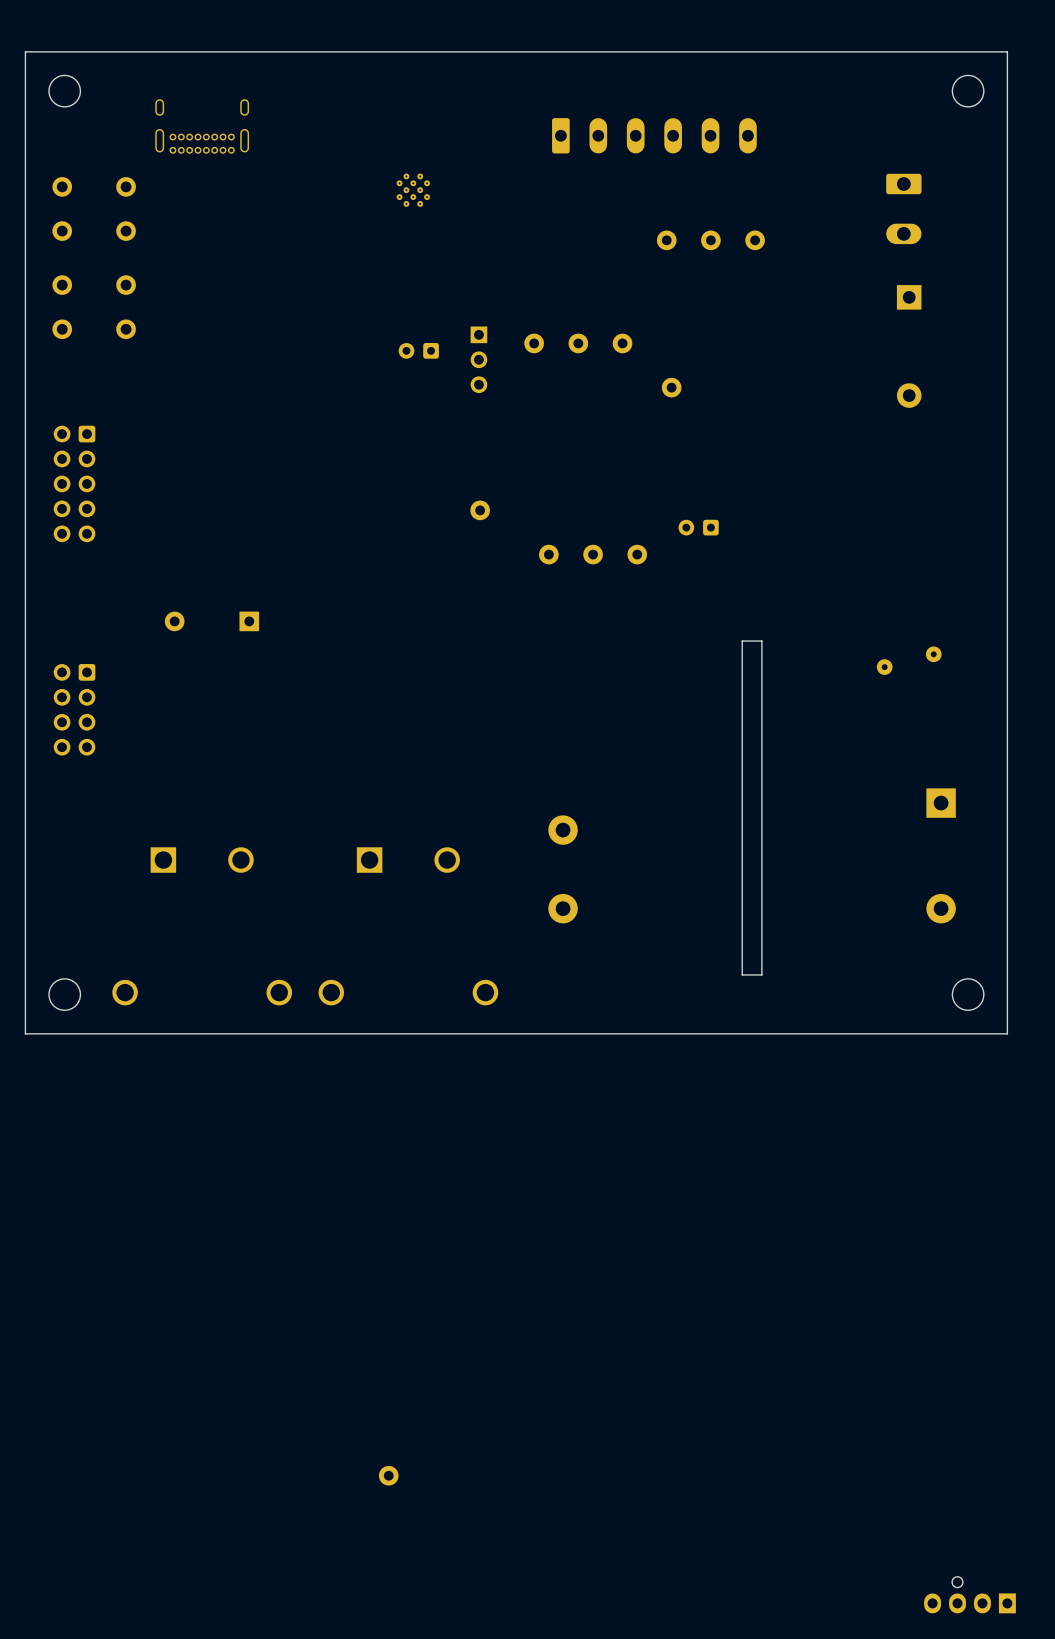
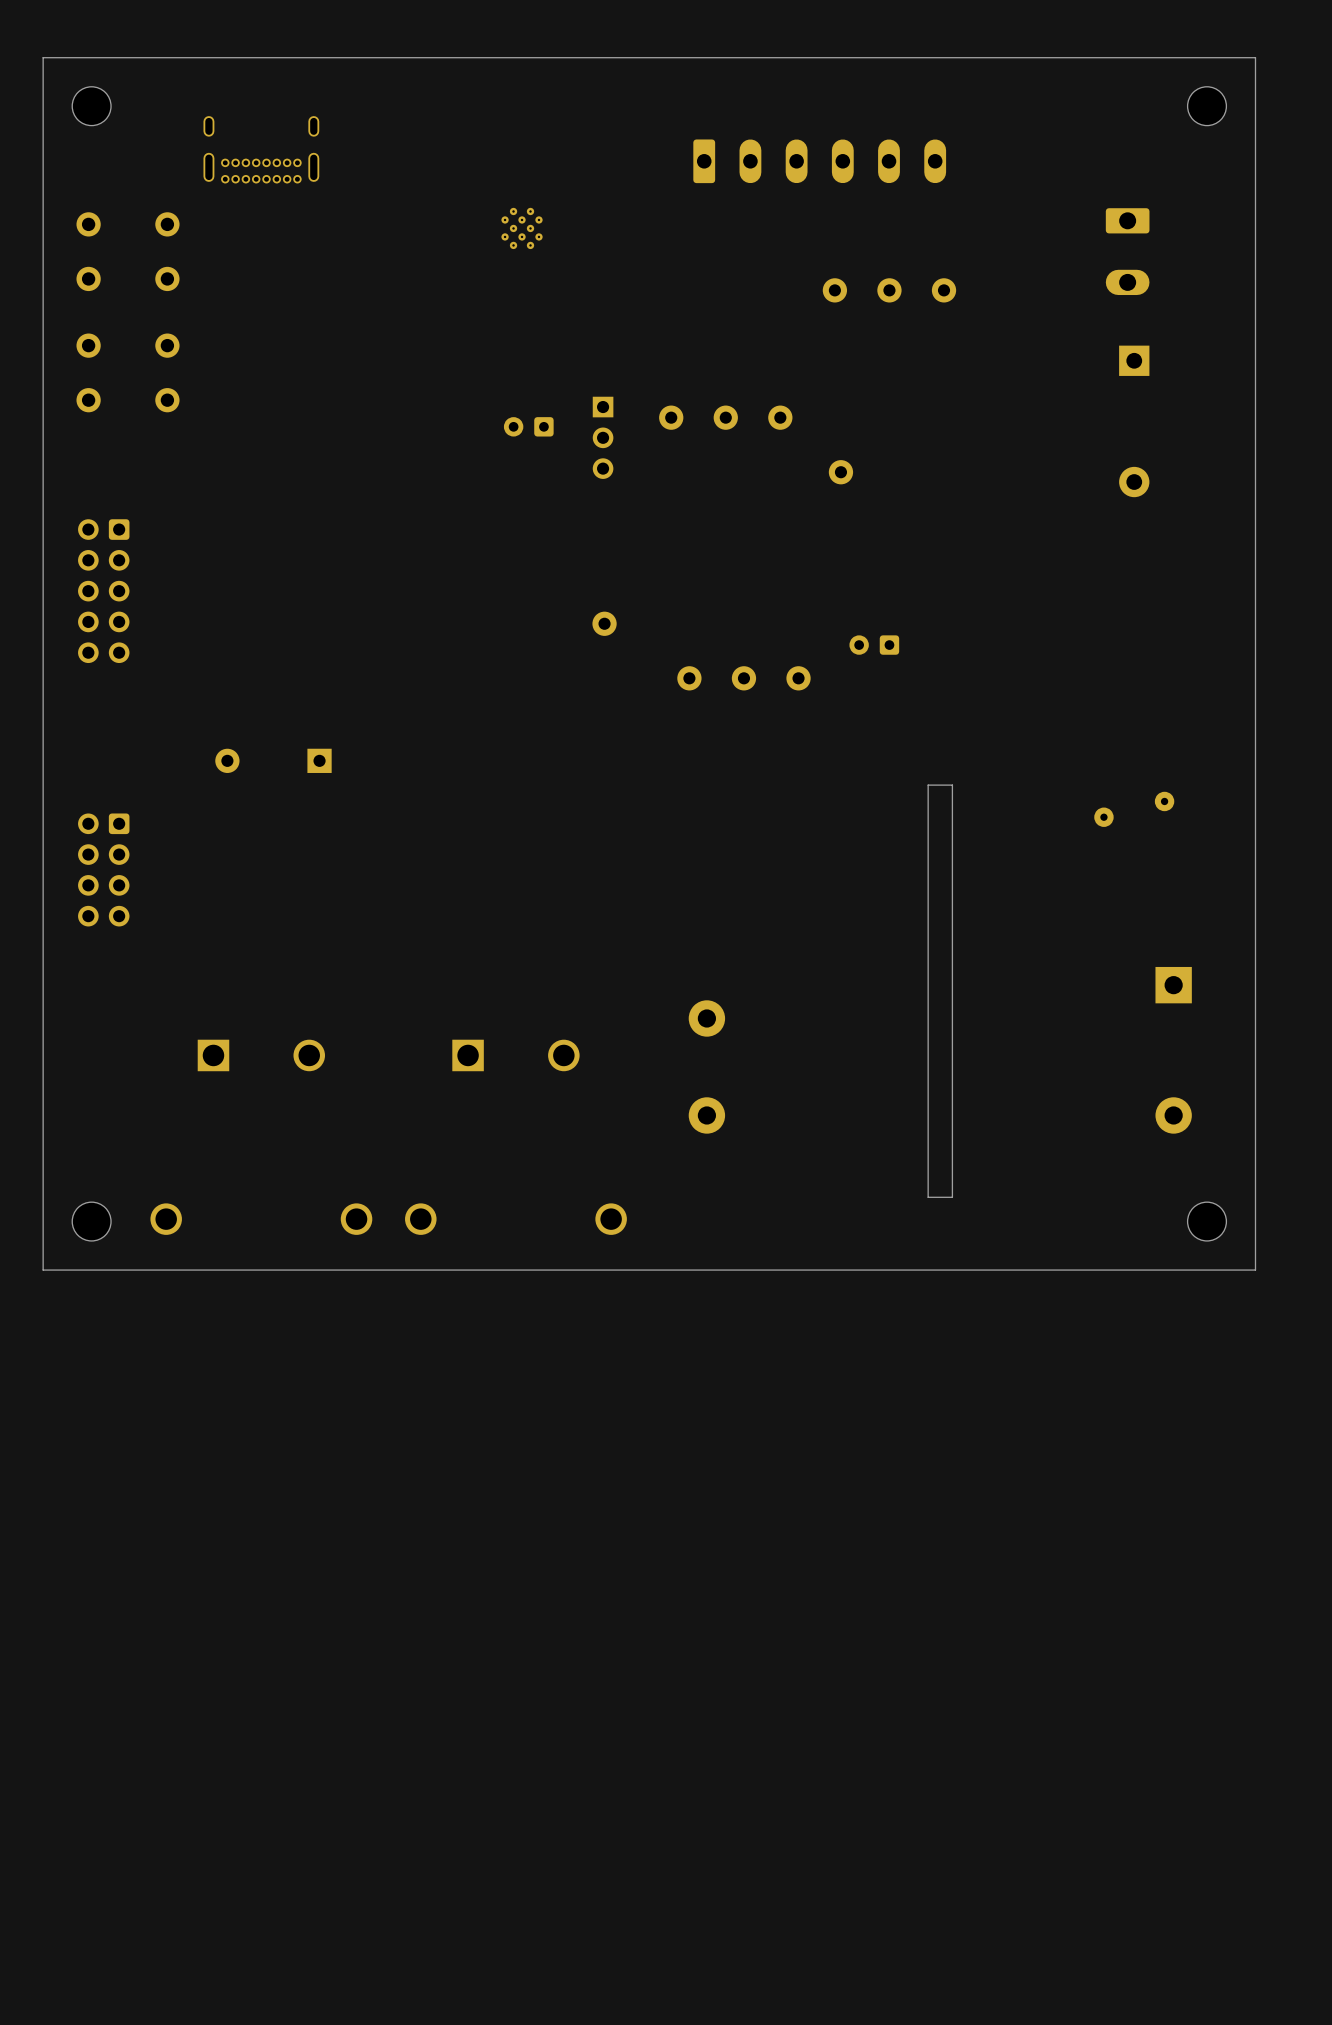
part: (388, 1475) -> none
part: (969, 1595) -> none

